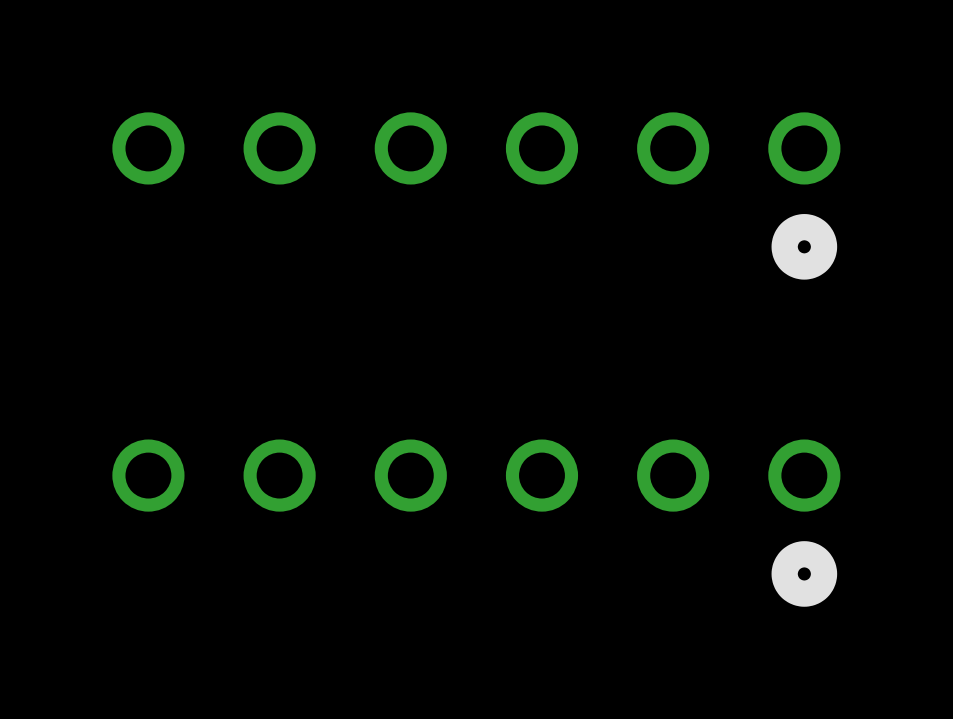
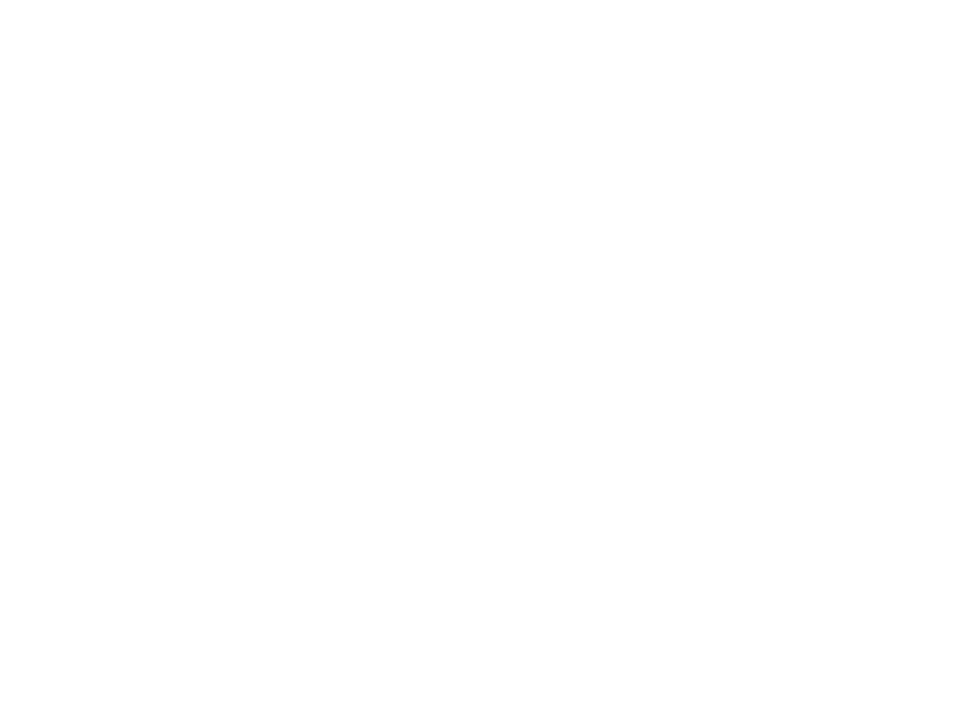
part: (476, 195) -> none
part: (476, 523) -> none

